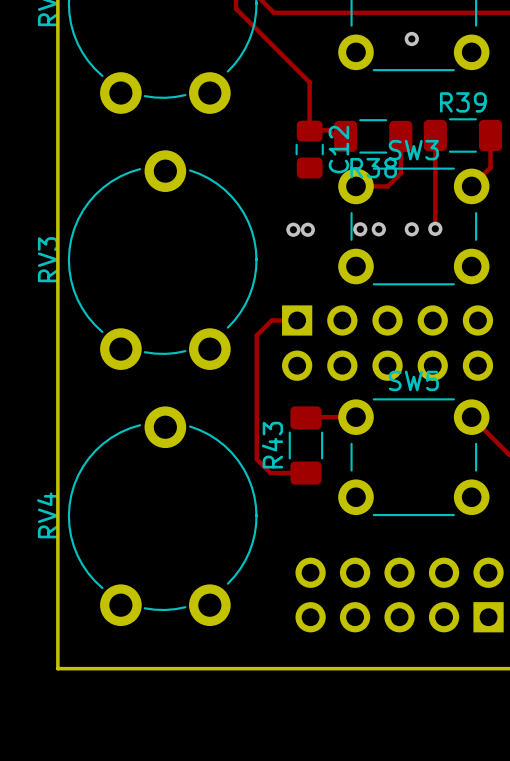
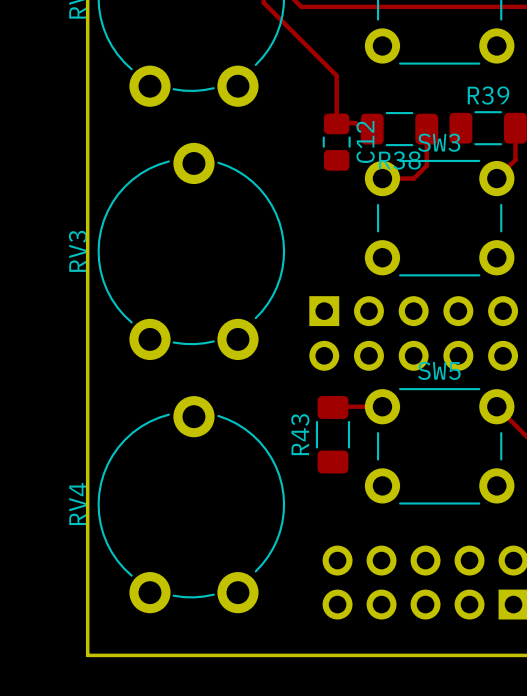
via: (411, 39) -> none
track: (435, 135) (435, 228) -> none
via: (435, 228) -> none
via: (293, 229) -> none
via: (307, 229) -> none
via: (360, 229) -> none
via: (378, 229) -> none
via: (411, 229) -> none
track: (297, 320) (271, 320) (256, 335) (256, 459) (270, 473) (305, 473) -> none

